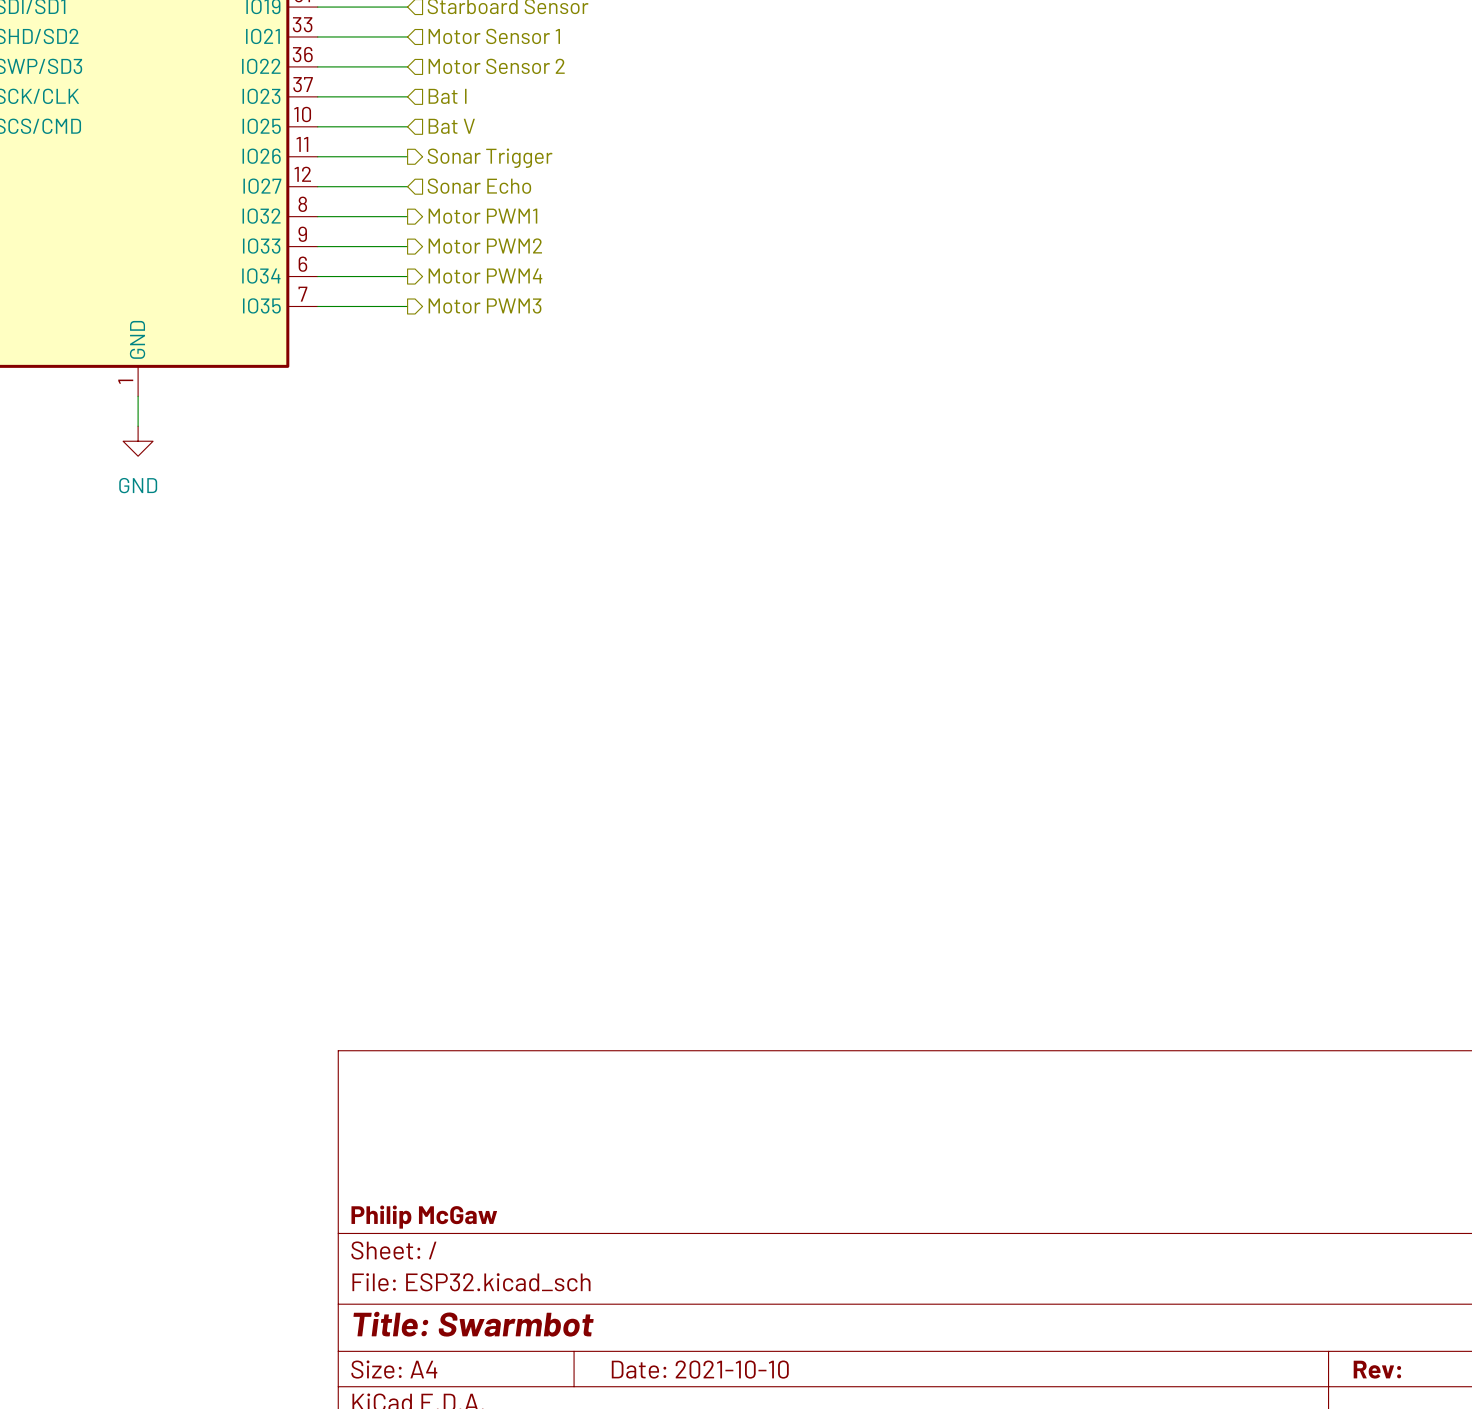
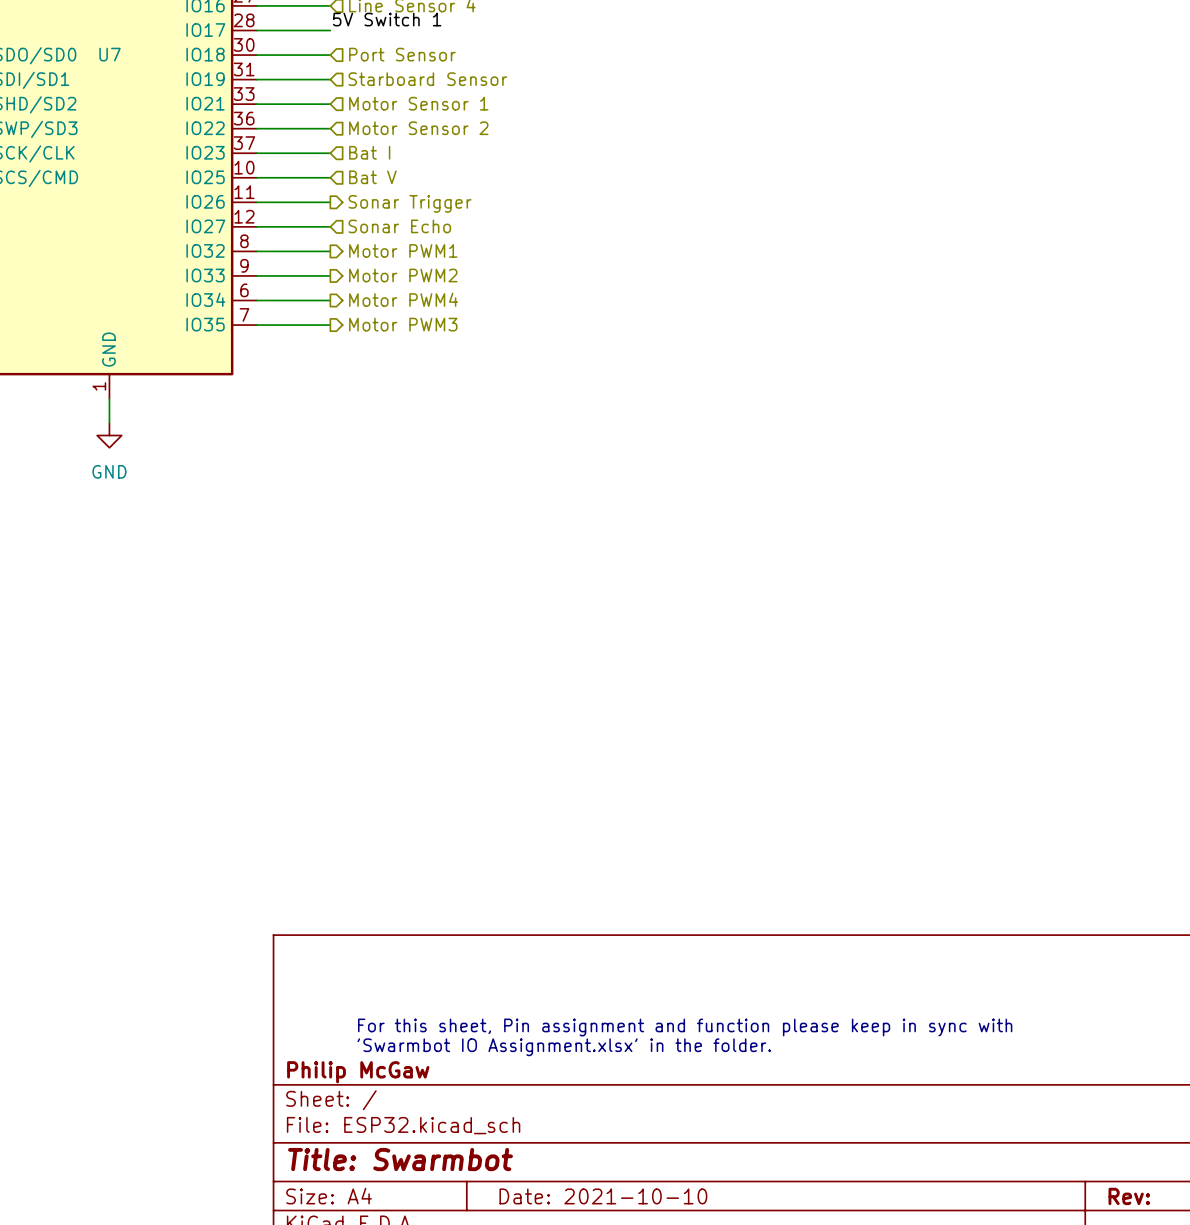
text: none -> For this sheet, Pin assignment and function please keep in sync with (685, 1027)
text: none -> 'Swarmbot IO Assignment.xlsx' in the folder. (564, 1047)

